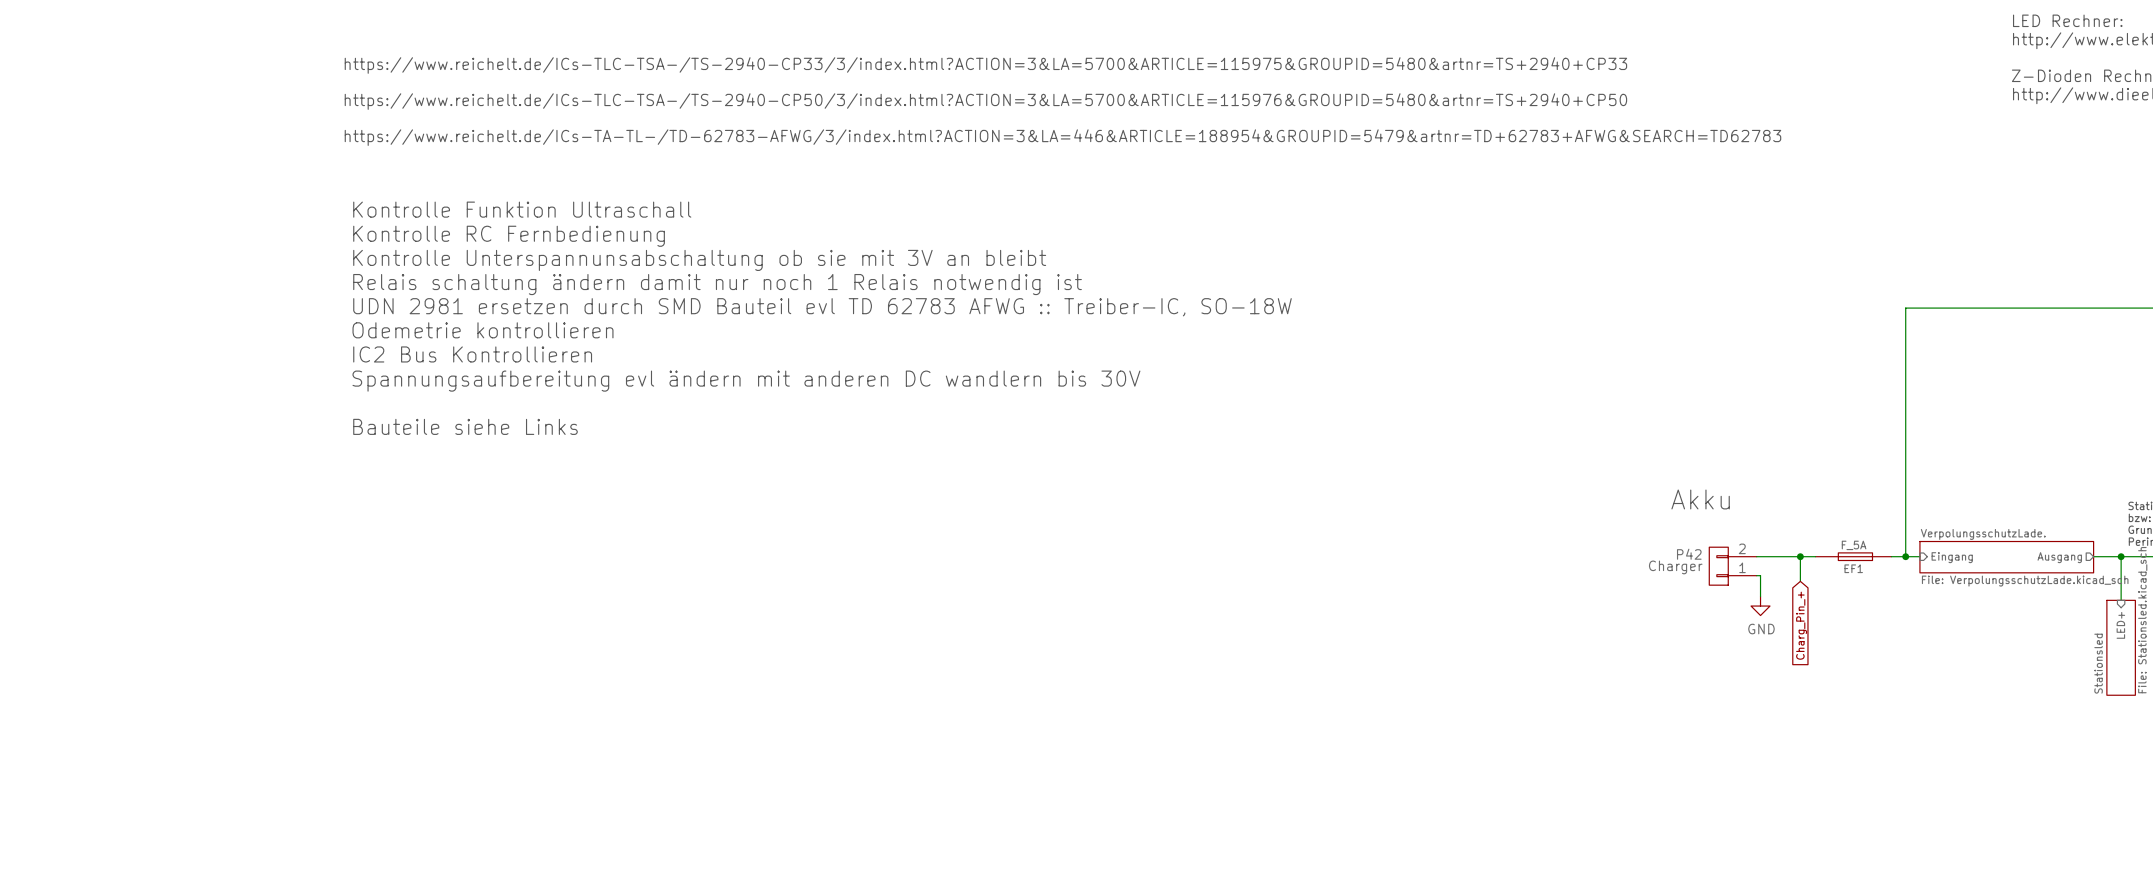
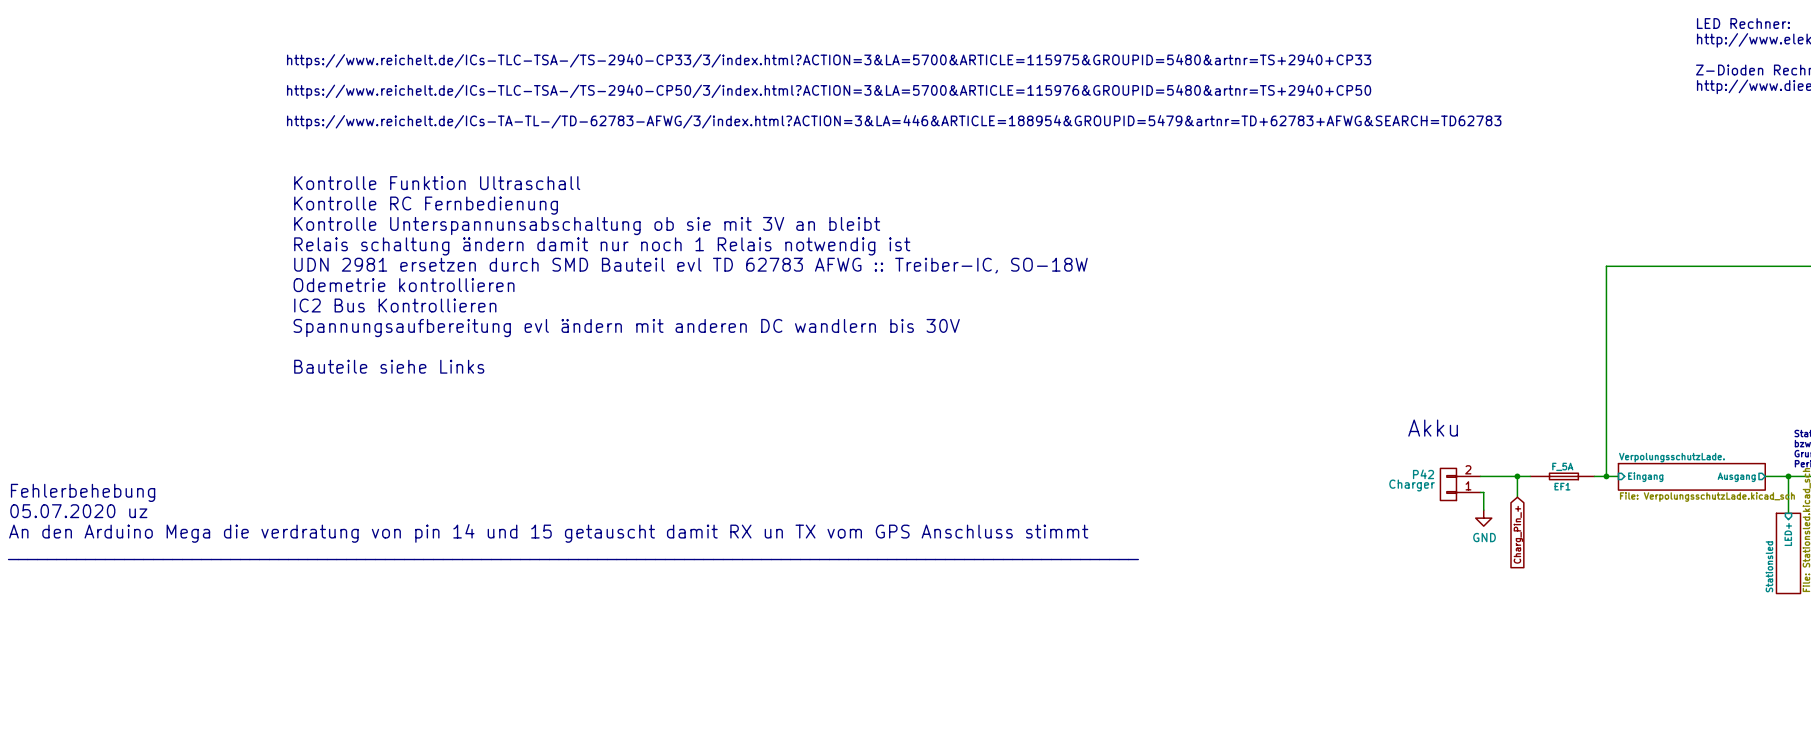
text: none -> Fehlerbehebung (83, 492)
text: none -> 05.07.2020 uz (78, 511)
text: none -> An den Arduino Mega die verdratung von pin 14 und 15 getauscht damit RX un TX vom GPS Anschluss stimmt (548, 533)
text: none -> _____________________________________________________________________________________________________________________ (573, 559)

